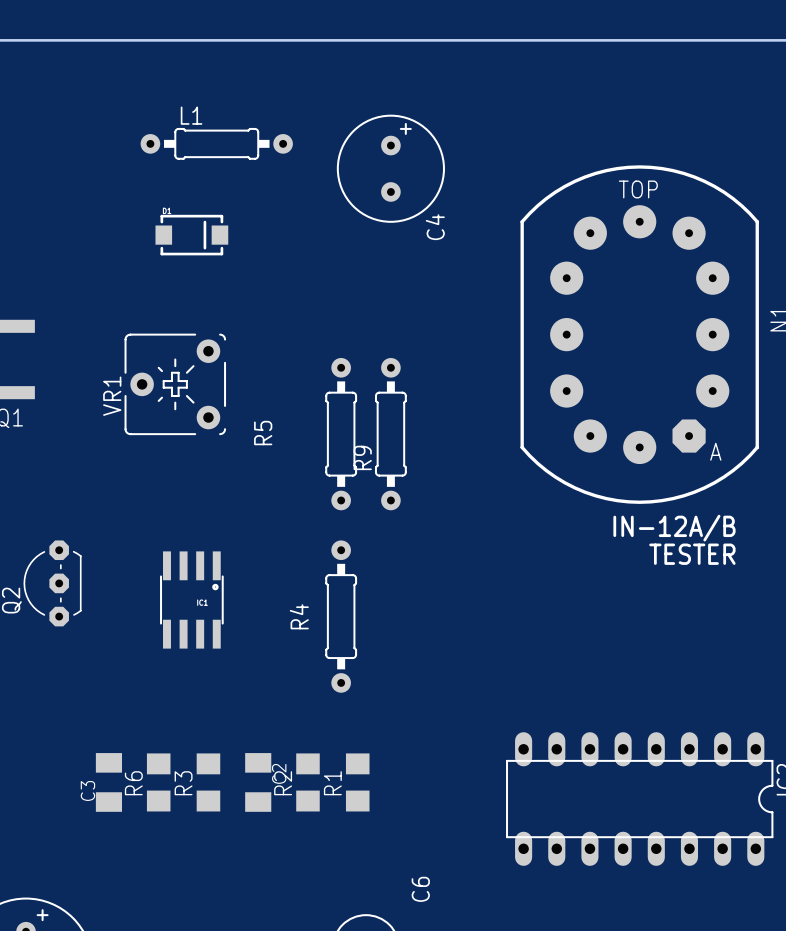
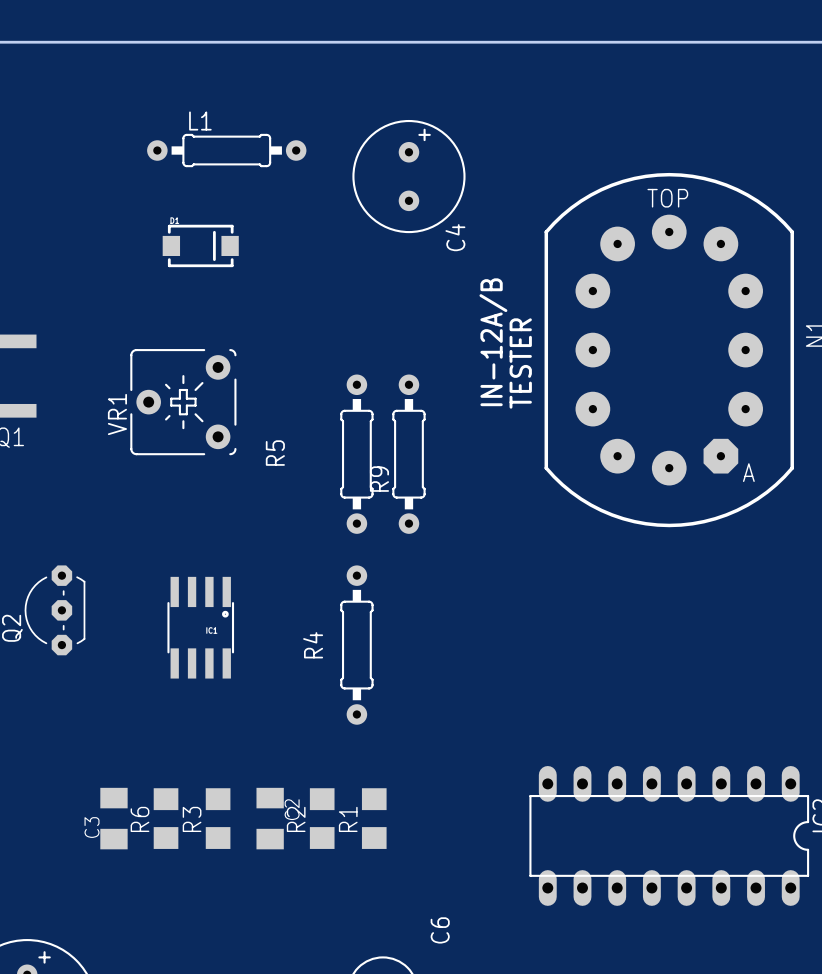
text rotation: 0° (674, 528) -> 90° counterclockwise (493, 342)
text position: IN-12A/B (674, 528) -> IN-12A/B (493, 342)
text rotation: 0° (692, 554) -> 90° counterclockwise (520, 363)
text position: TESTER (692, 554) -> TESTER (520, 363)

